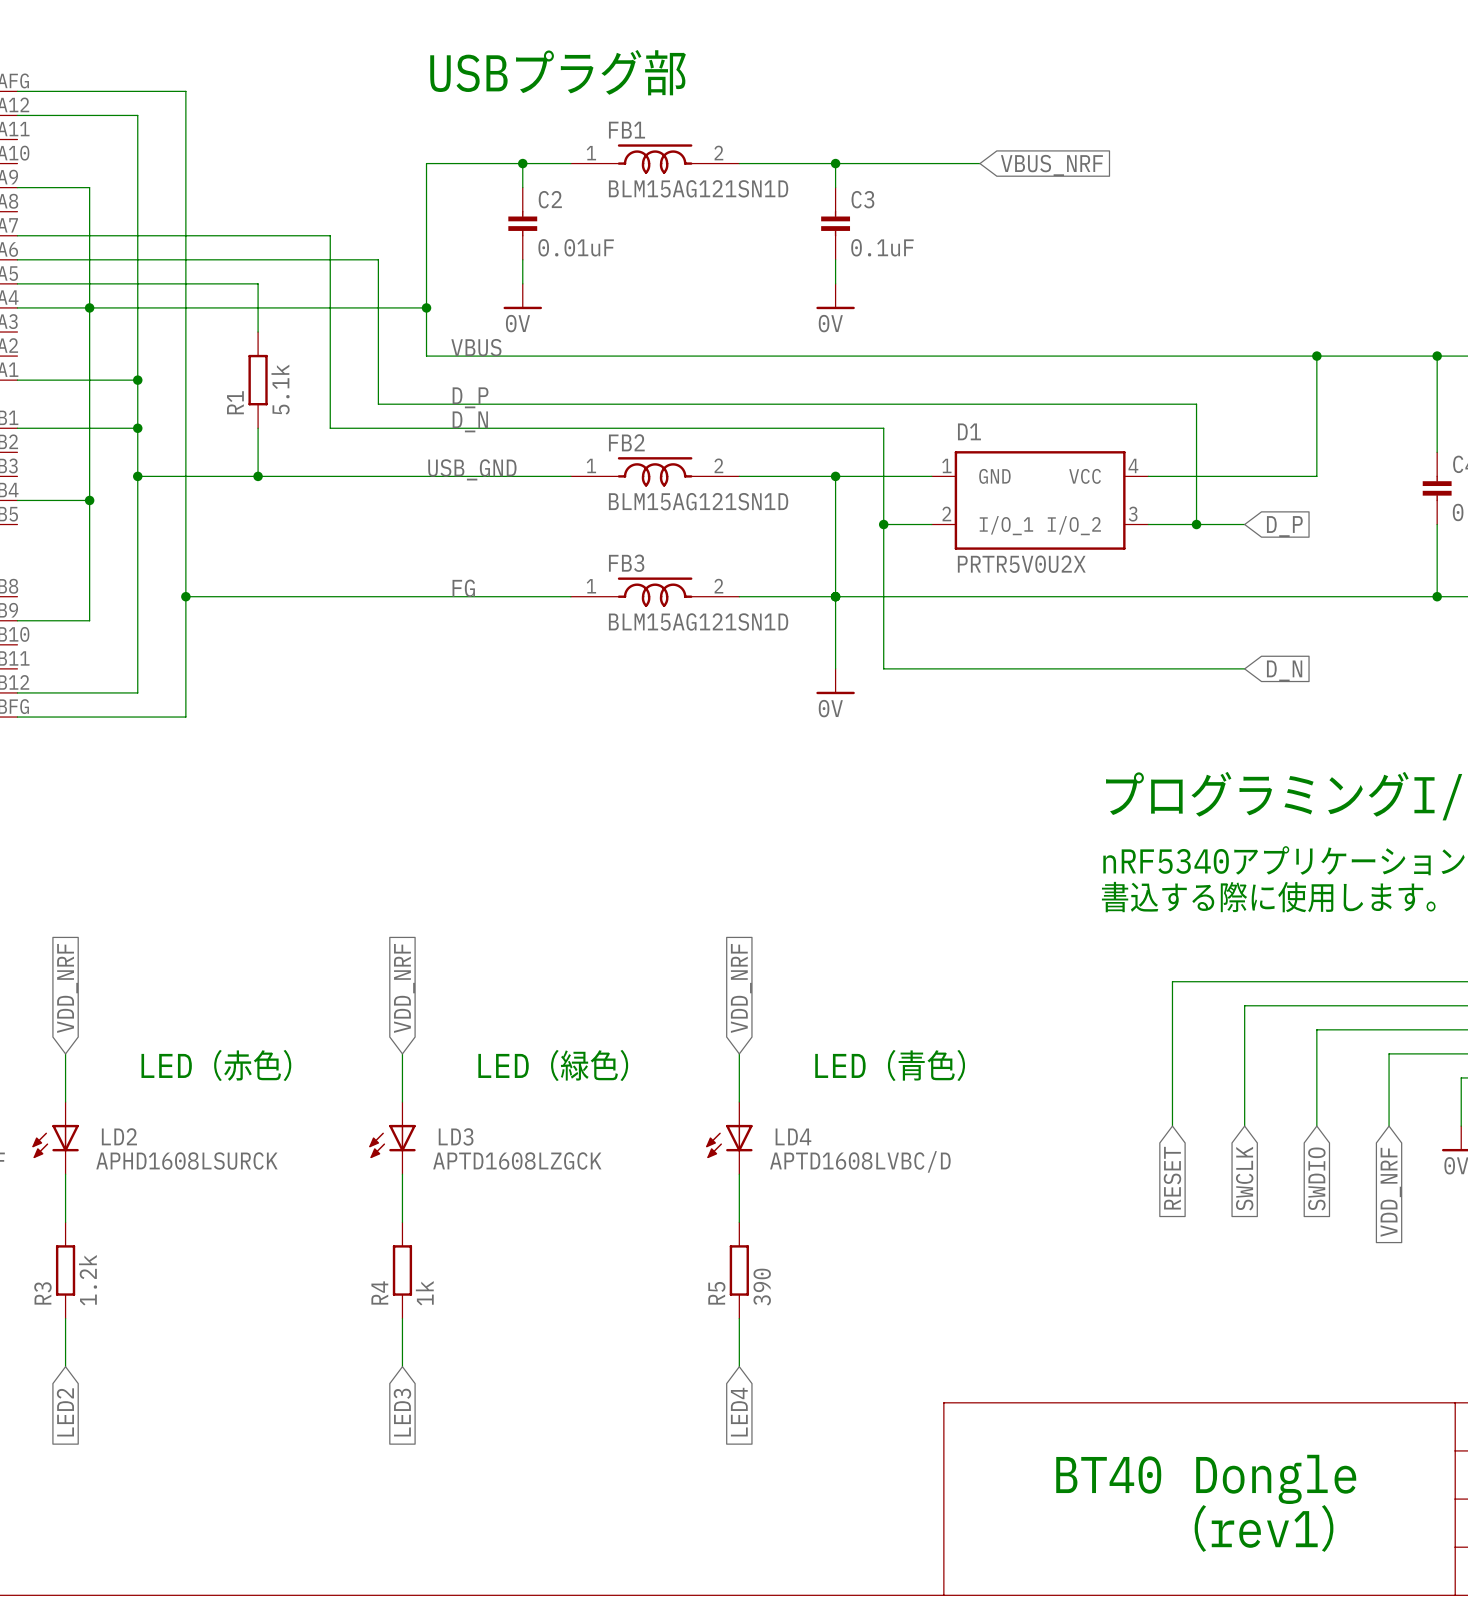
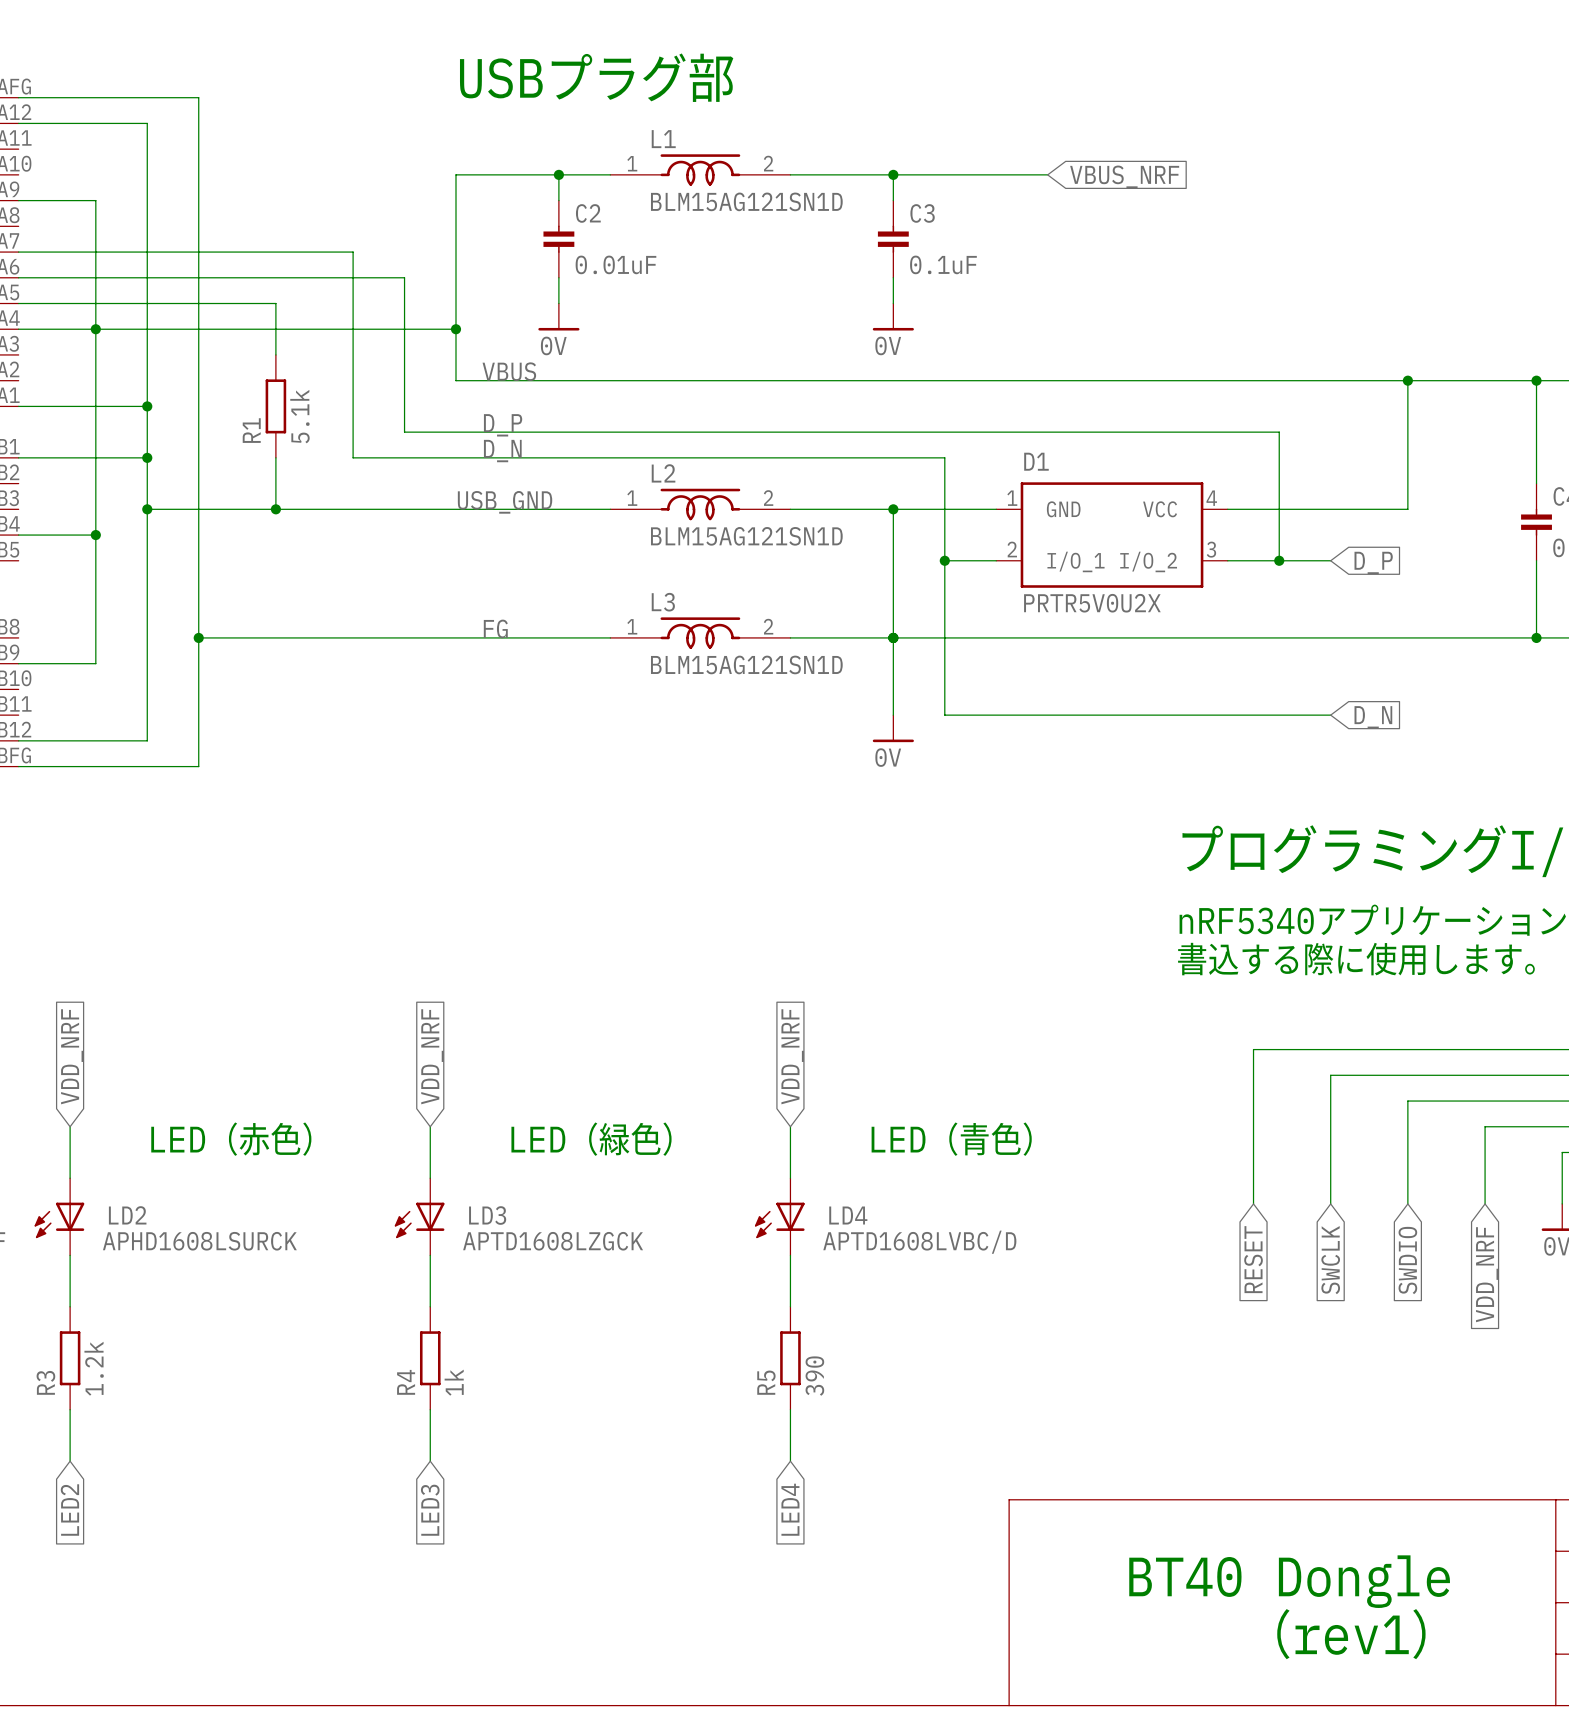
FB1 name: FB1 (627, 130) -> L1 (663, 139)
FB2 name: FB2 (626, 442) -> L2 (663, 473)
FB3 name: FB3 (626, 563) -> L3 (663, 602)

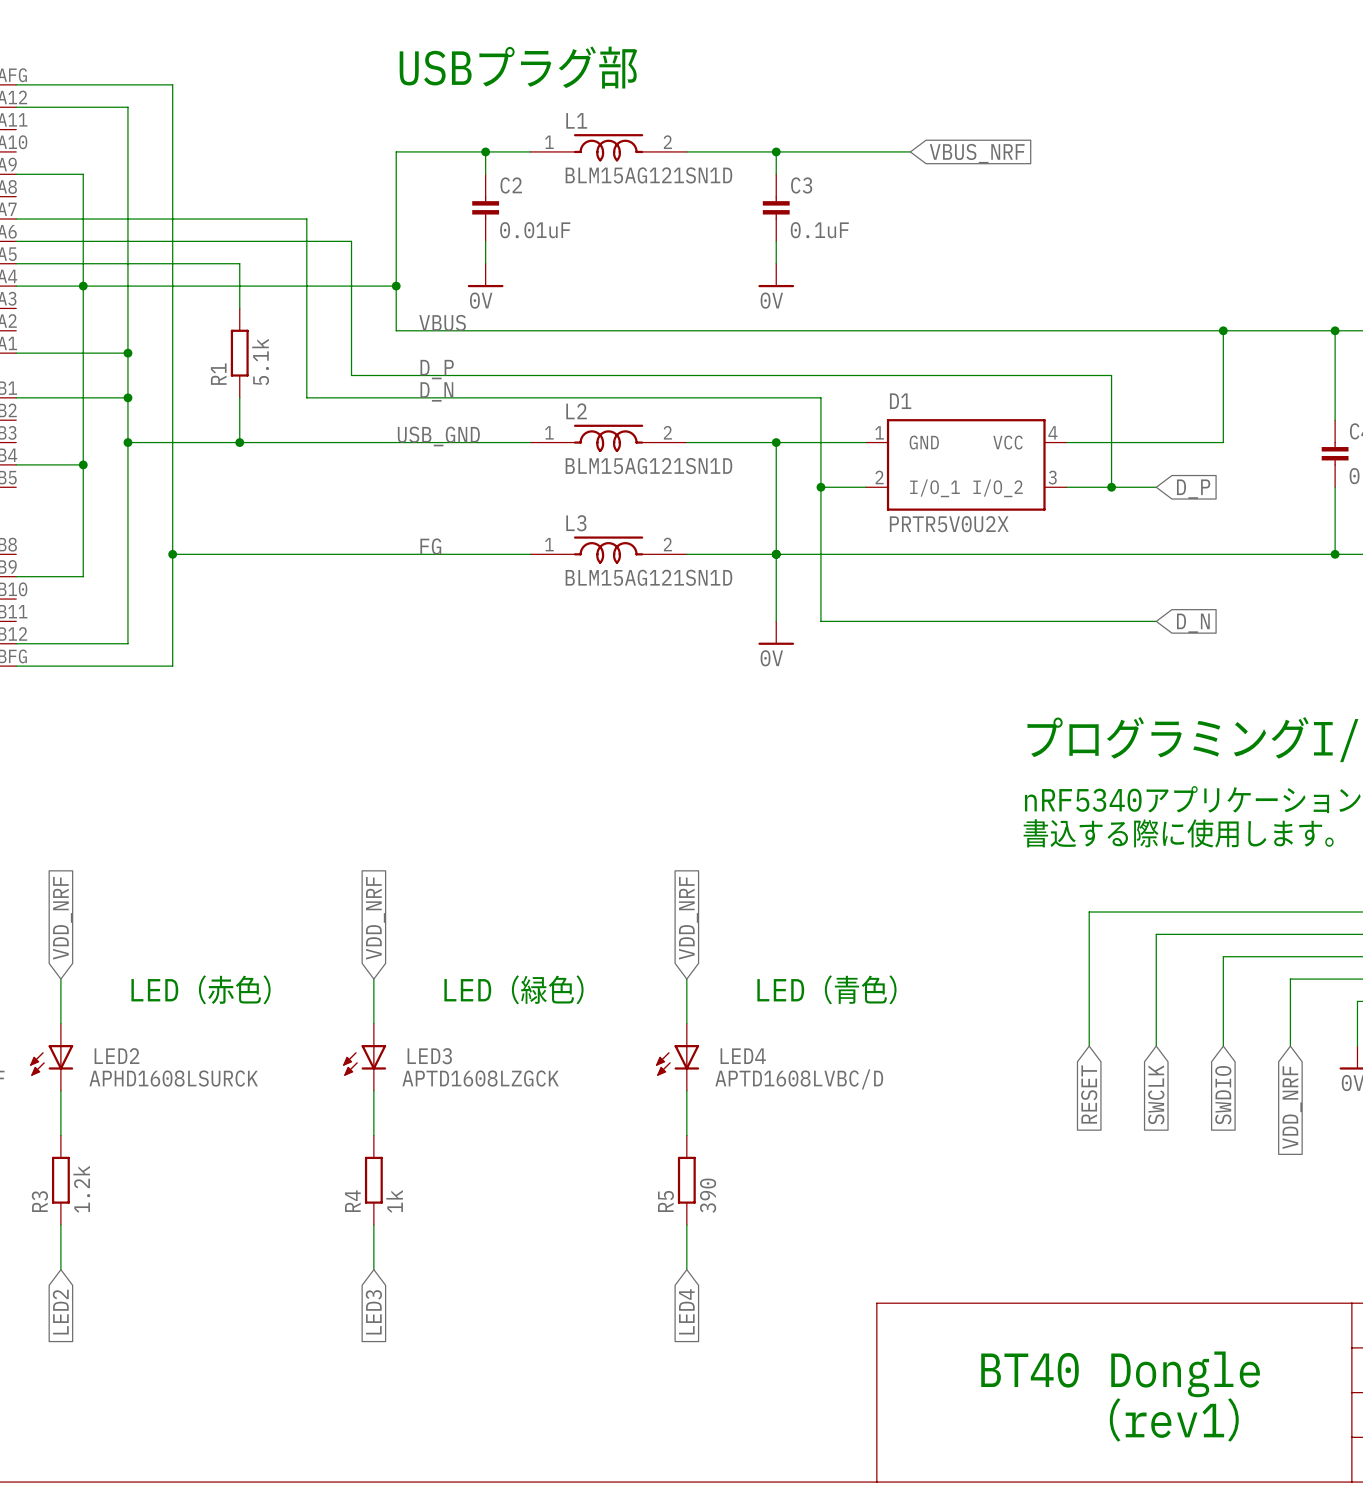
LD2 name: LD2 (127, 1215) -> LED2 (116, 1056)
LD3 name: LD3 (487, 1215) -> LED3 (429, 1056)
LD4 name: LD4 (848, 1215) -> LED4 (743, 1056)

